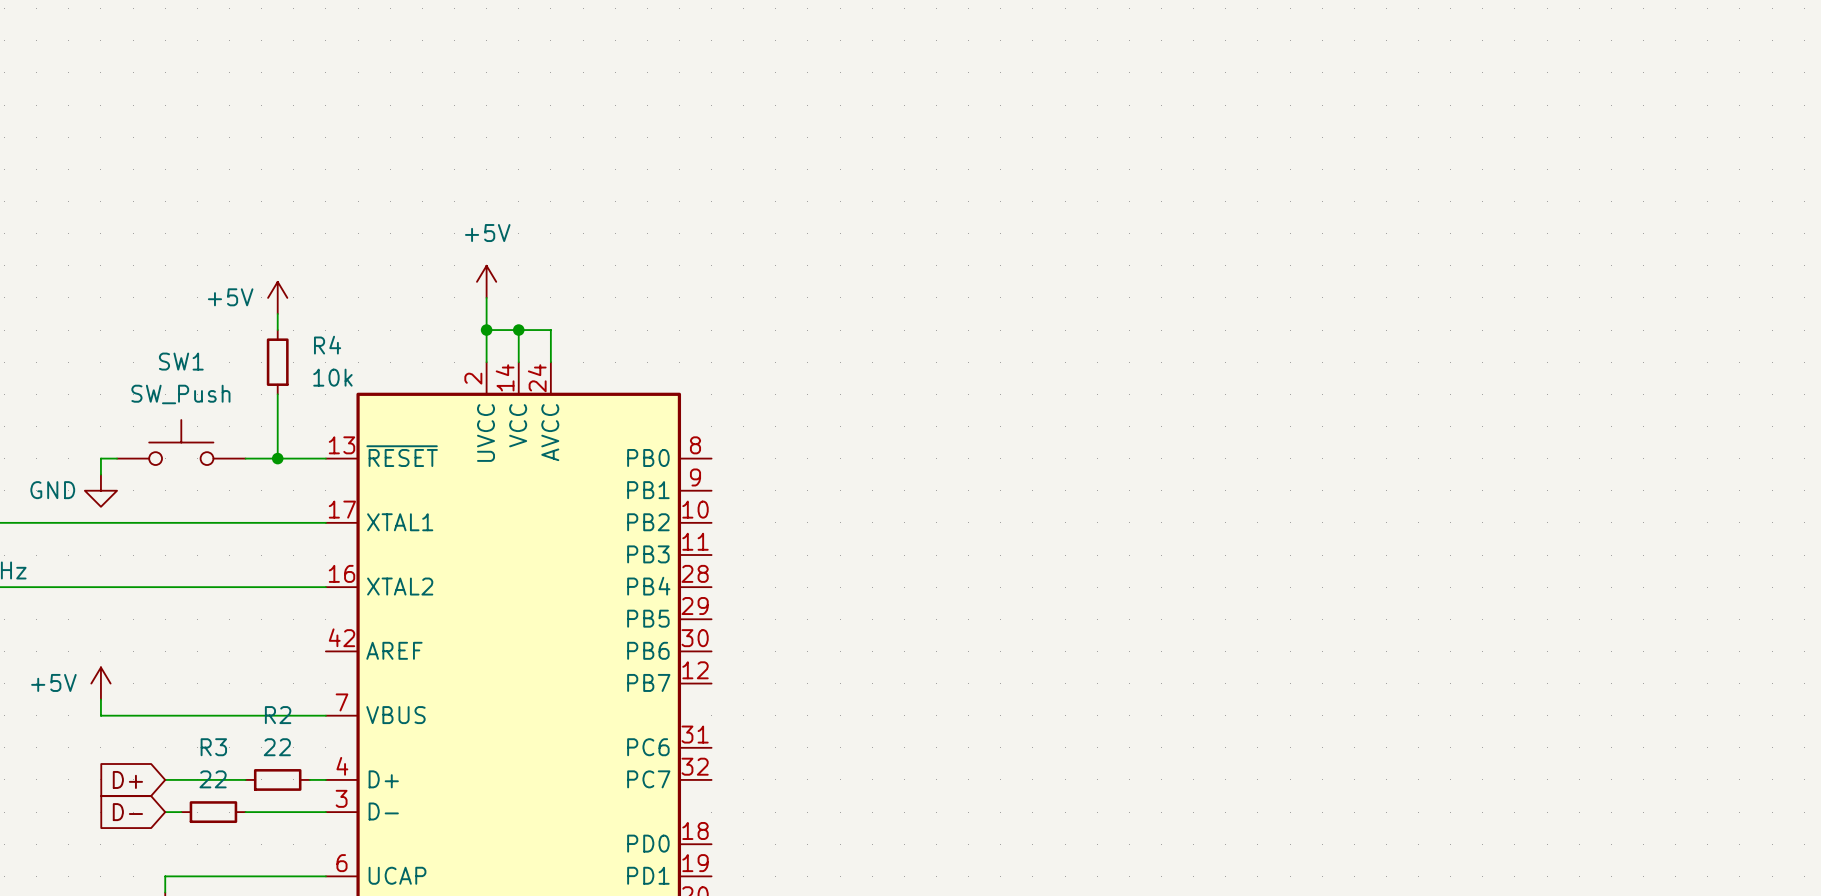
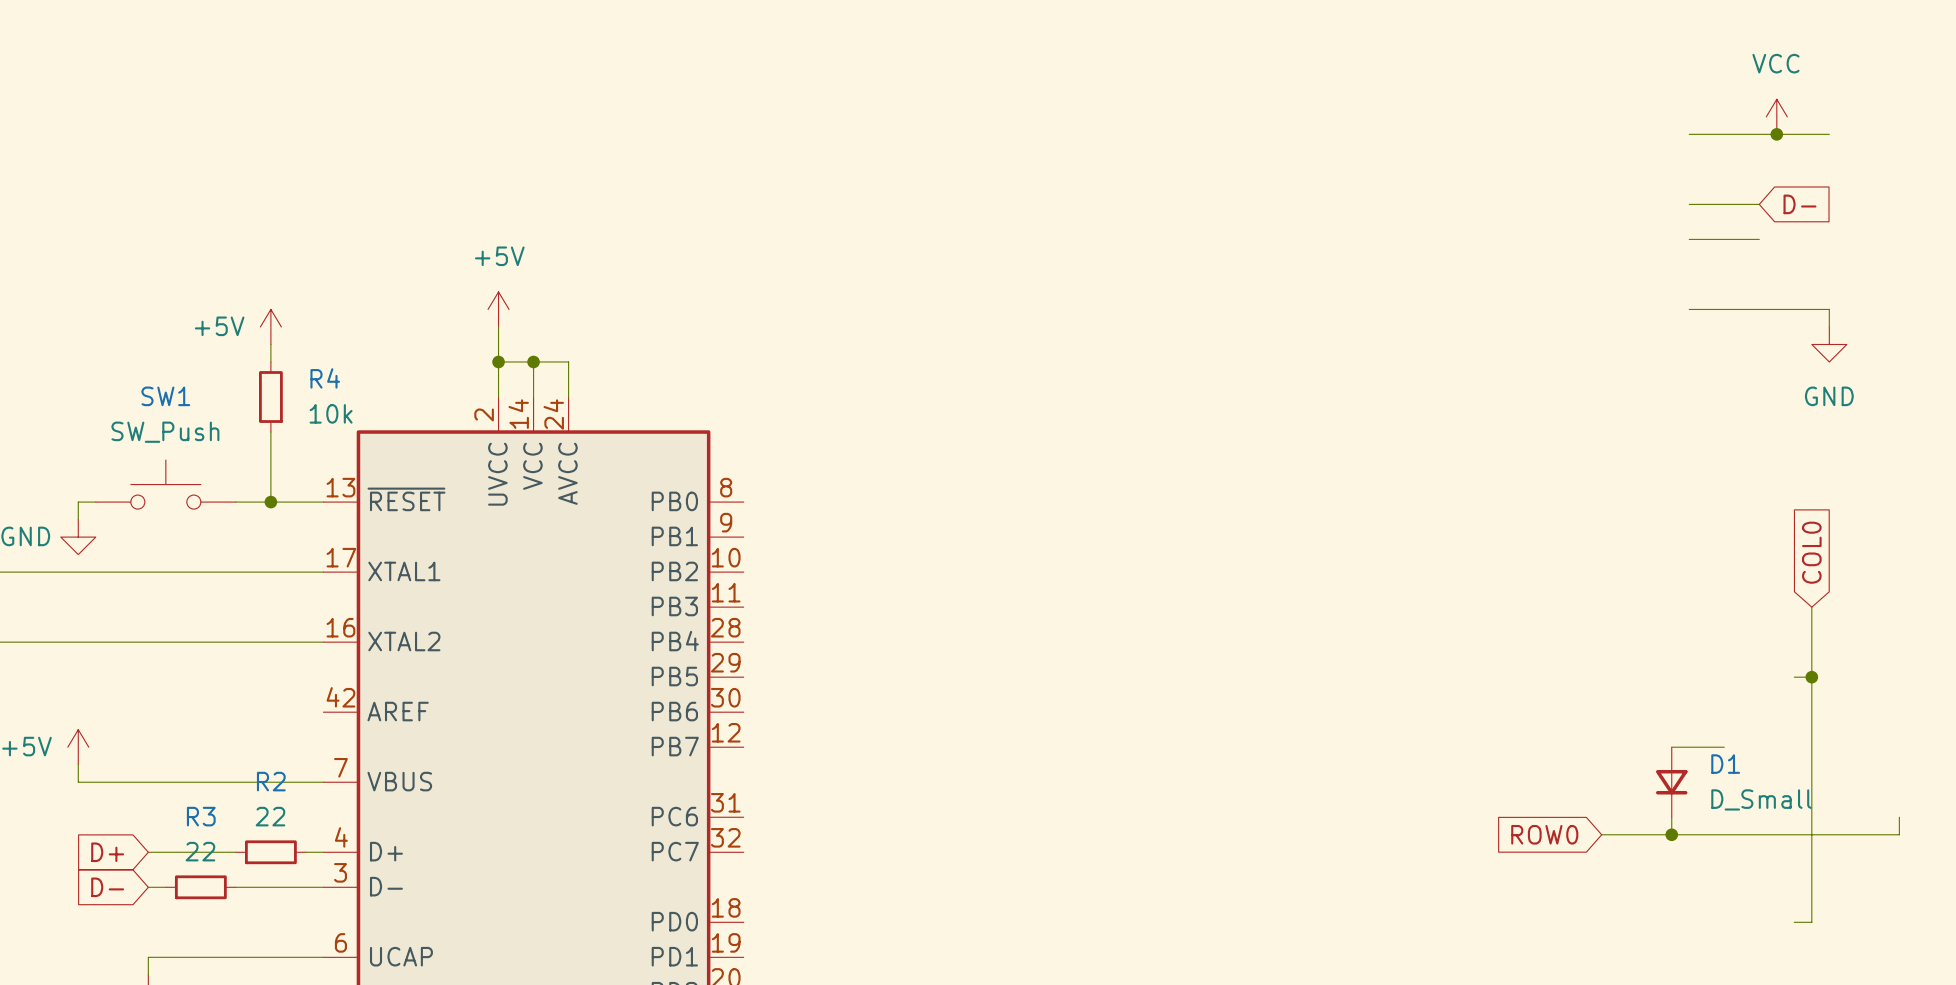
power symbol: none -> VCC (1776, 116)
wire: none -> (1689, 134) (1829, 134)
junction: none -> (1776, 134)
wire: none -> (1689, 204) (1759, 204)
global label: none -> D- (1799, 204)
wire: none -> (1689, 239) (1759, 239)
wire: none -> (1689, 309) (1829, 309) (1829, 326)
power symbol: none -> GND (1829, 344)
global label: none -> COL0 (1811, 552)
wire: none -> (1811, 607) (1811, 922) (1794, 922)
wire: none -> (1794, 677) (1811, 677)
junction: none -> (1811, 677)
wire: none -> (1671, 747) (1724, 747)
D1: none -> D_Small (1671, 782)
wire: none -> (1671, 817) (1671, 834)
wire: none -> (1899, 817) (1899, 834) (1601, 834)
global label: none -> ROW0 (1544, 834)
junction: none -> (1671, 834)

